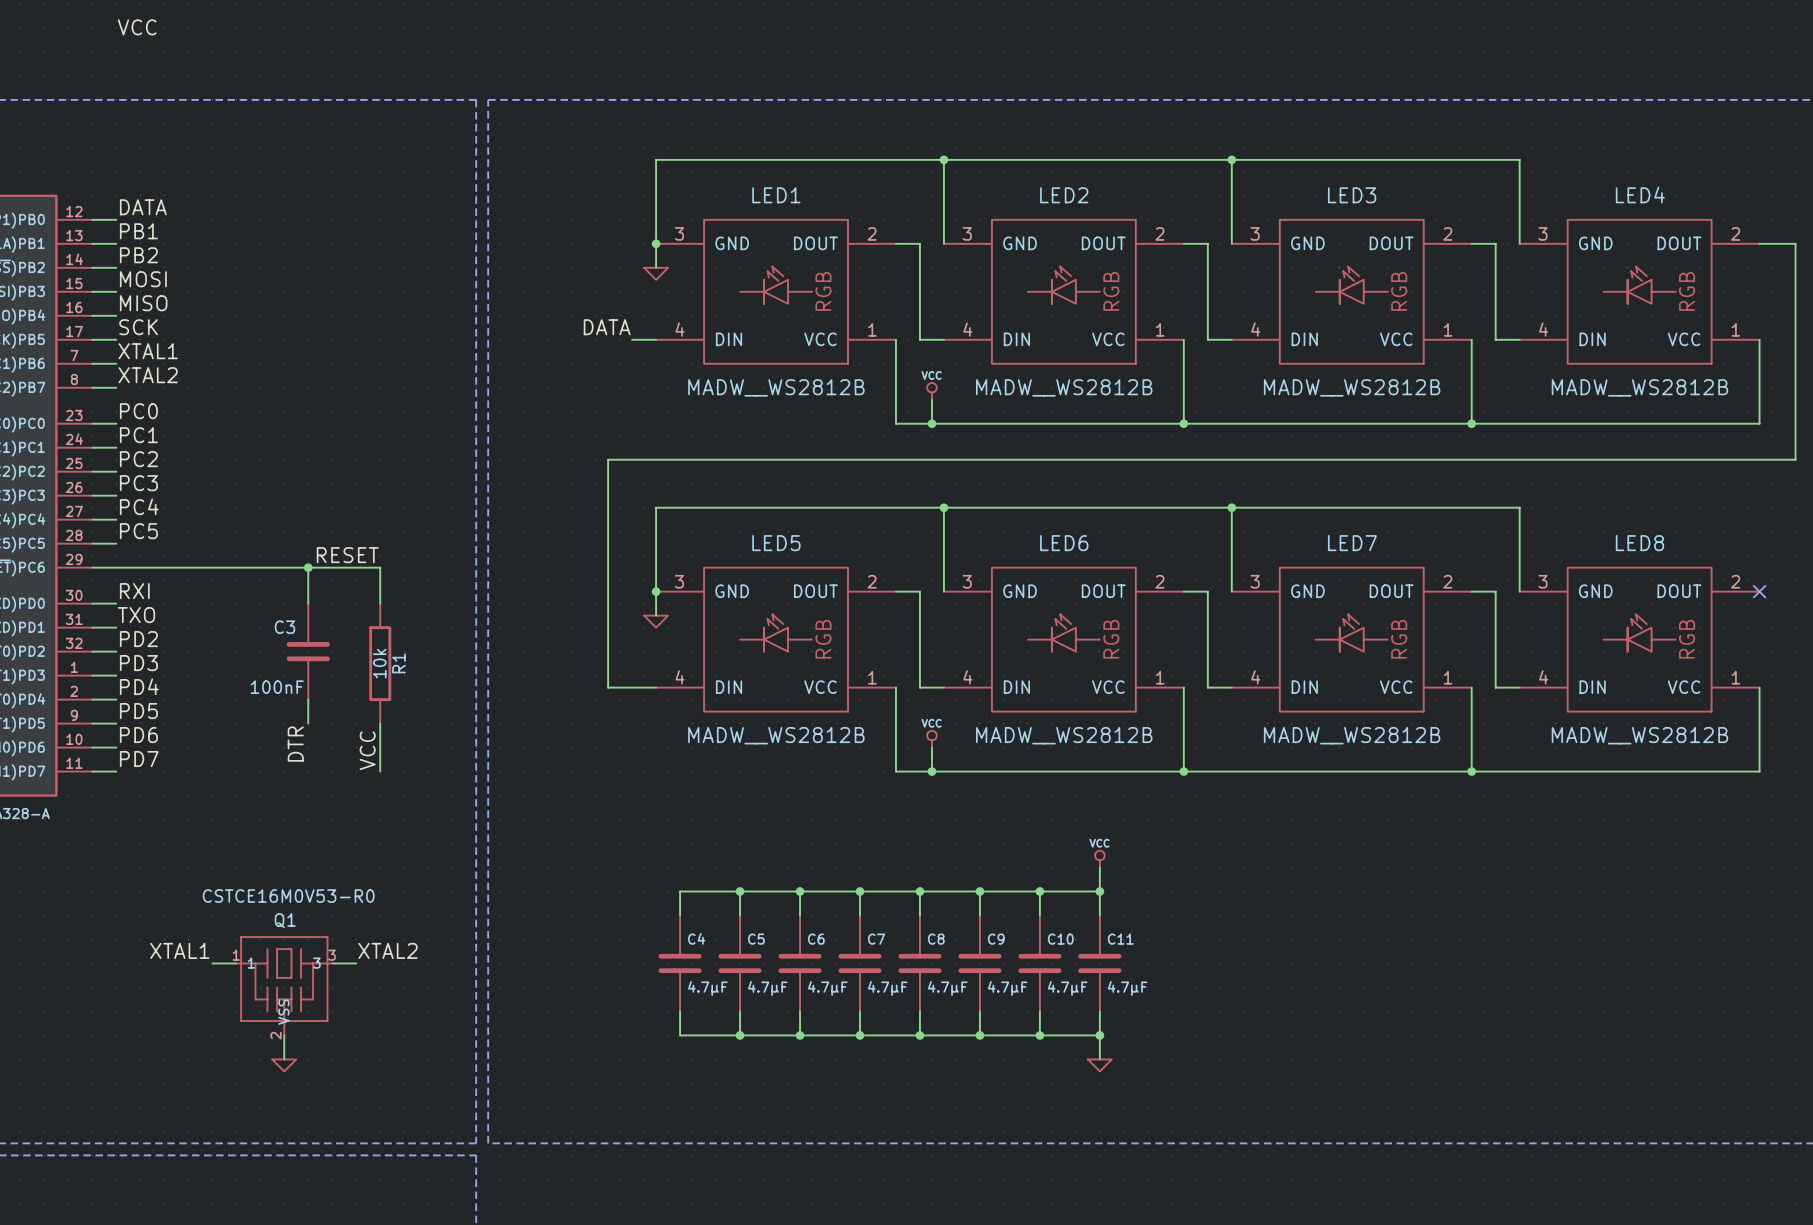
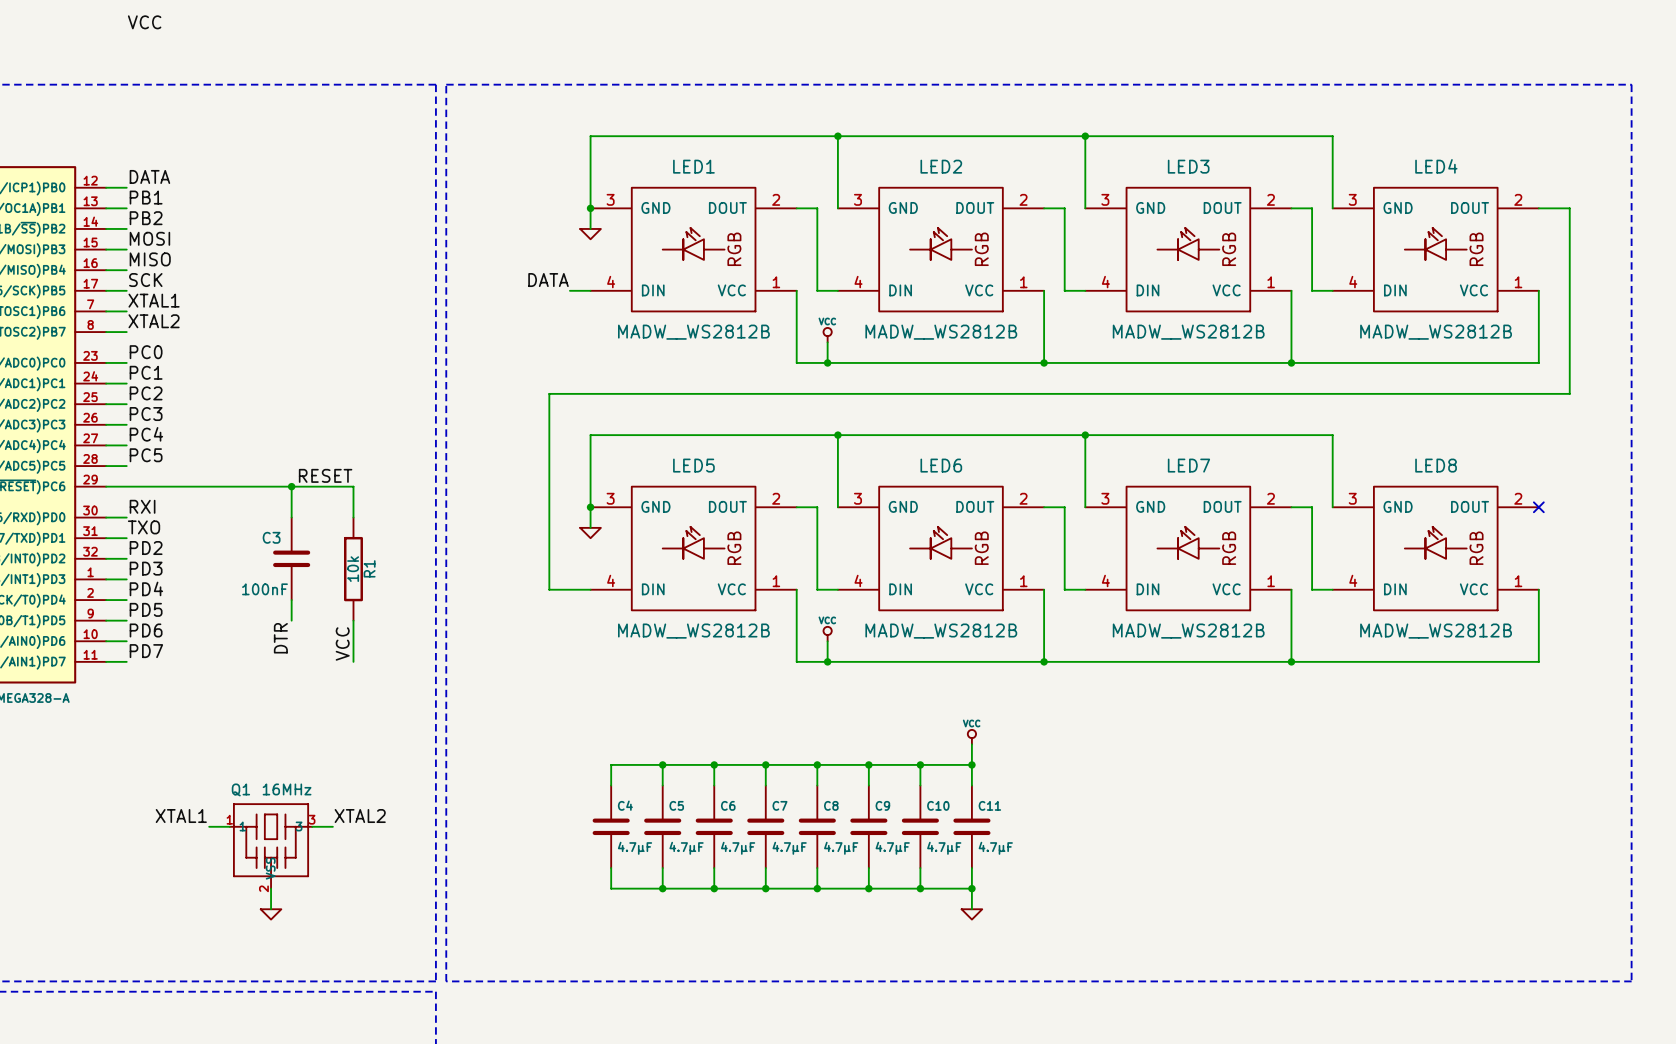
Q1 value: CSTCE16M0V53-R0 (288, 896) -> 16MHz (287, 789)
Q1 name position: Q1 (285, 920) -> Q1 (240, 789)

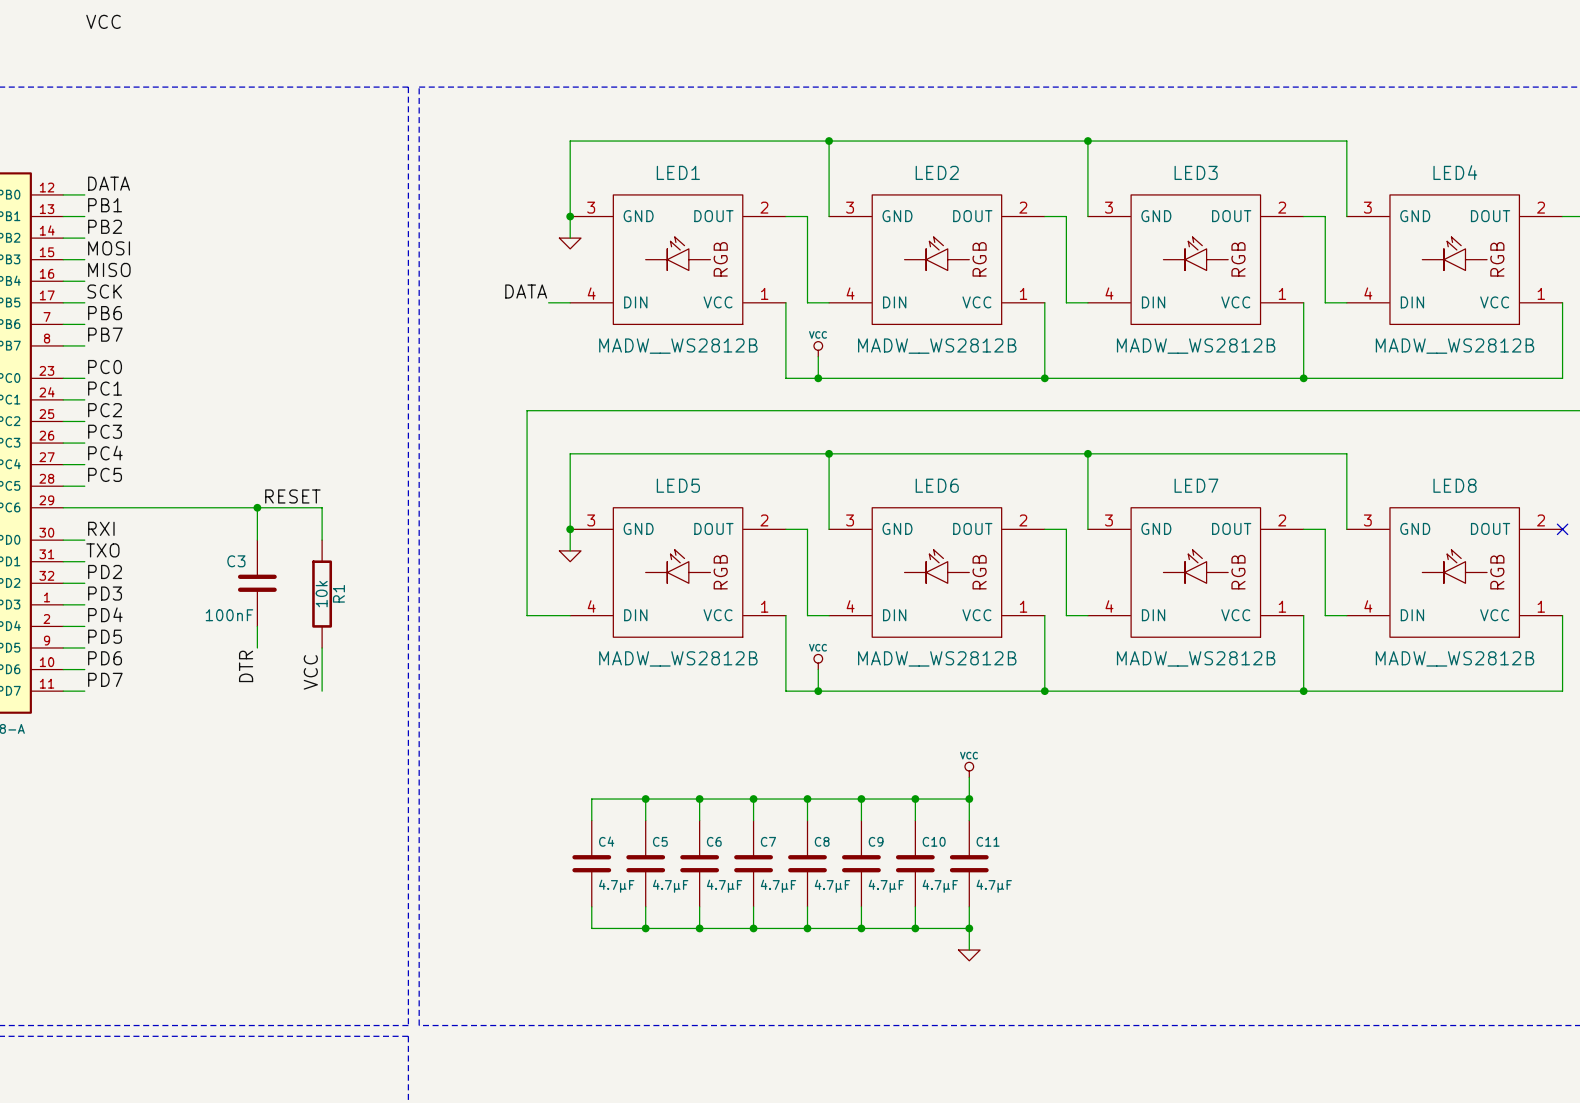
label: XTAL1 (154, 300) -> PB6 (105, 313)
label: XTAL2 (154, 321) -> PB7 (105, 334)
label: XTAL1 (181, 816) -> none
label: XTAL2 (360, 816) -> none
wire: (209, 826) (229, 826) -> none
wire: (312, 826) (332, 826) -> none
Q1: 16MHz (271, 846) -> none
wire: (271, 888) (271, 909) -> none
power symbol: (271, 914) -> none

